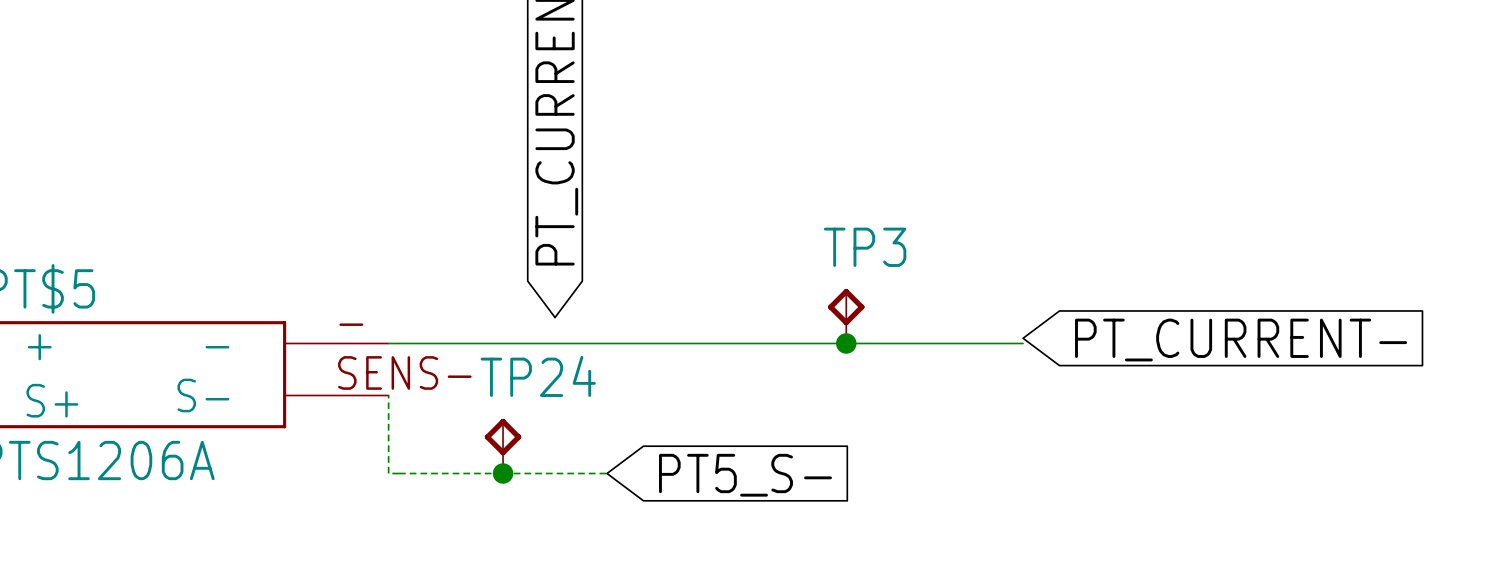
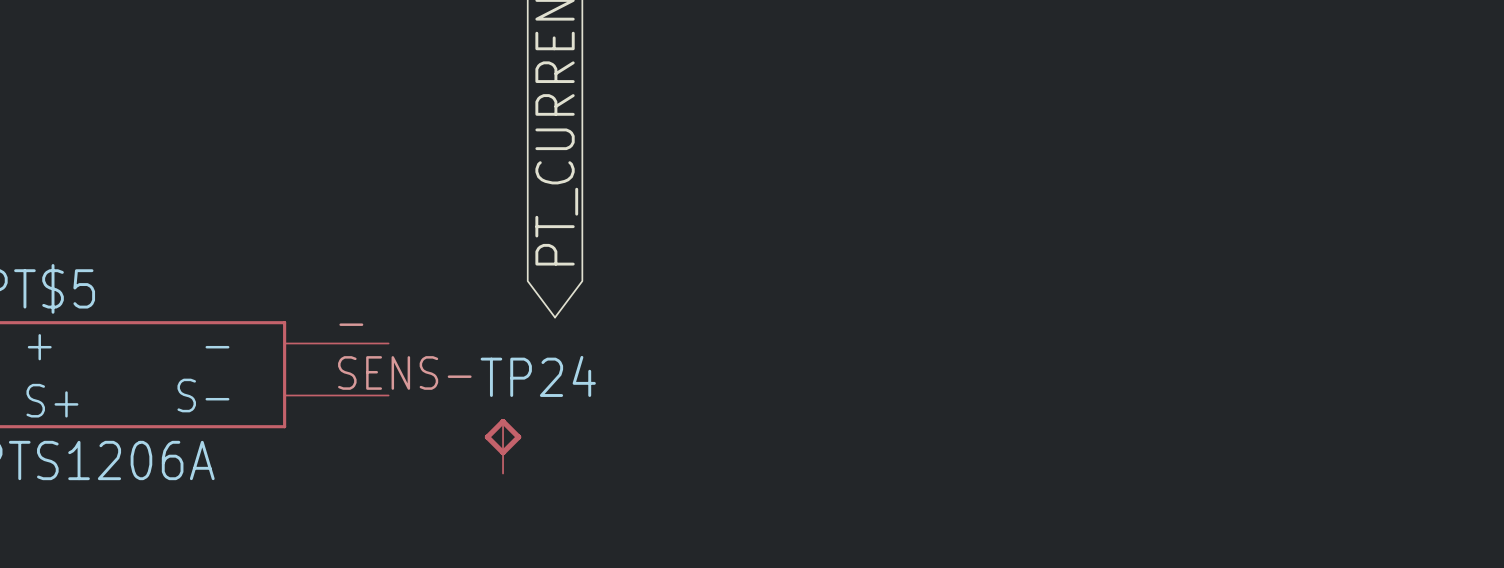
TP3: (846, 316) -> none
global label: PT_CURRENT- (1241, 340) -> none
wire: (388, 343) (1023, 343) -> none
junction: (846, 343) -> none
wire: (388, 395) (388, 473) (607, 473) -> none
junction: (503, 473) -> none
global label: PT5_S- (745, 475) -> none

